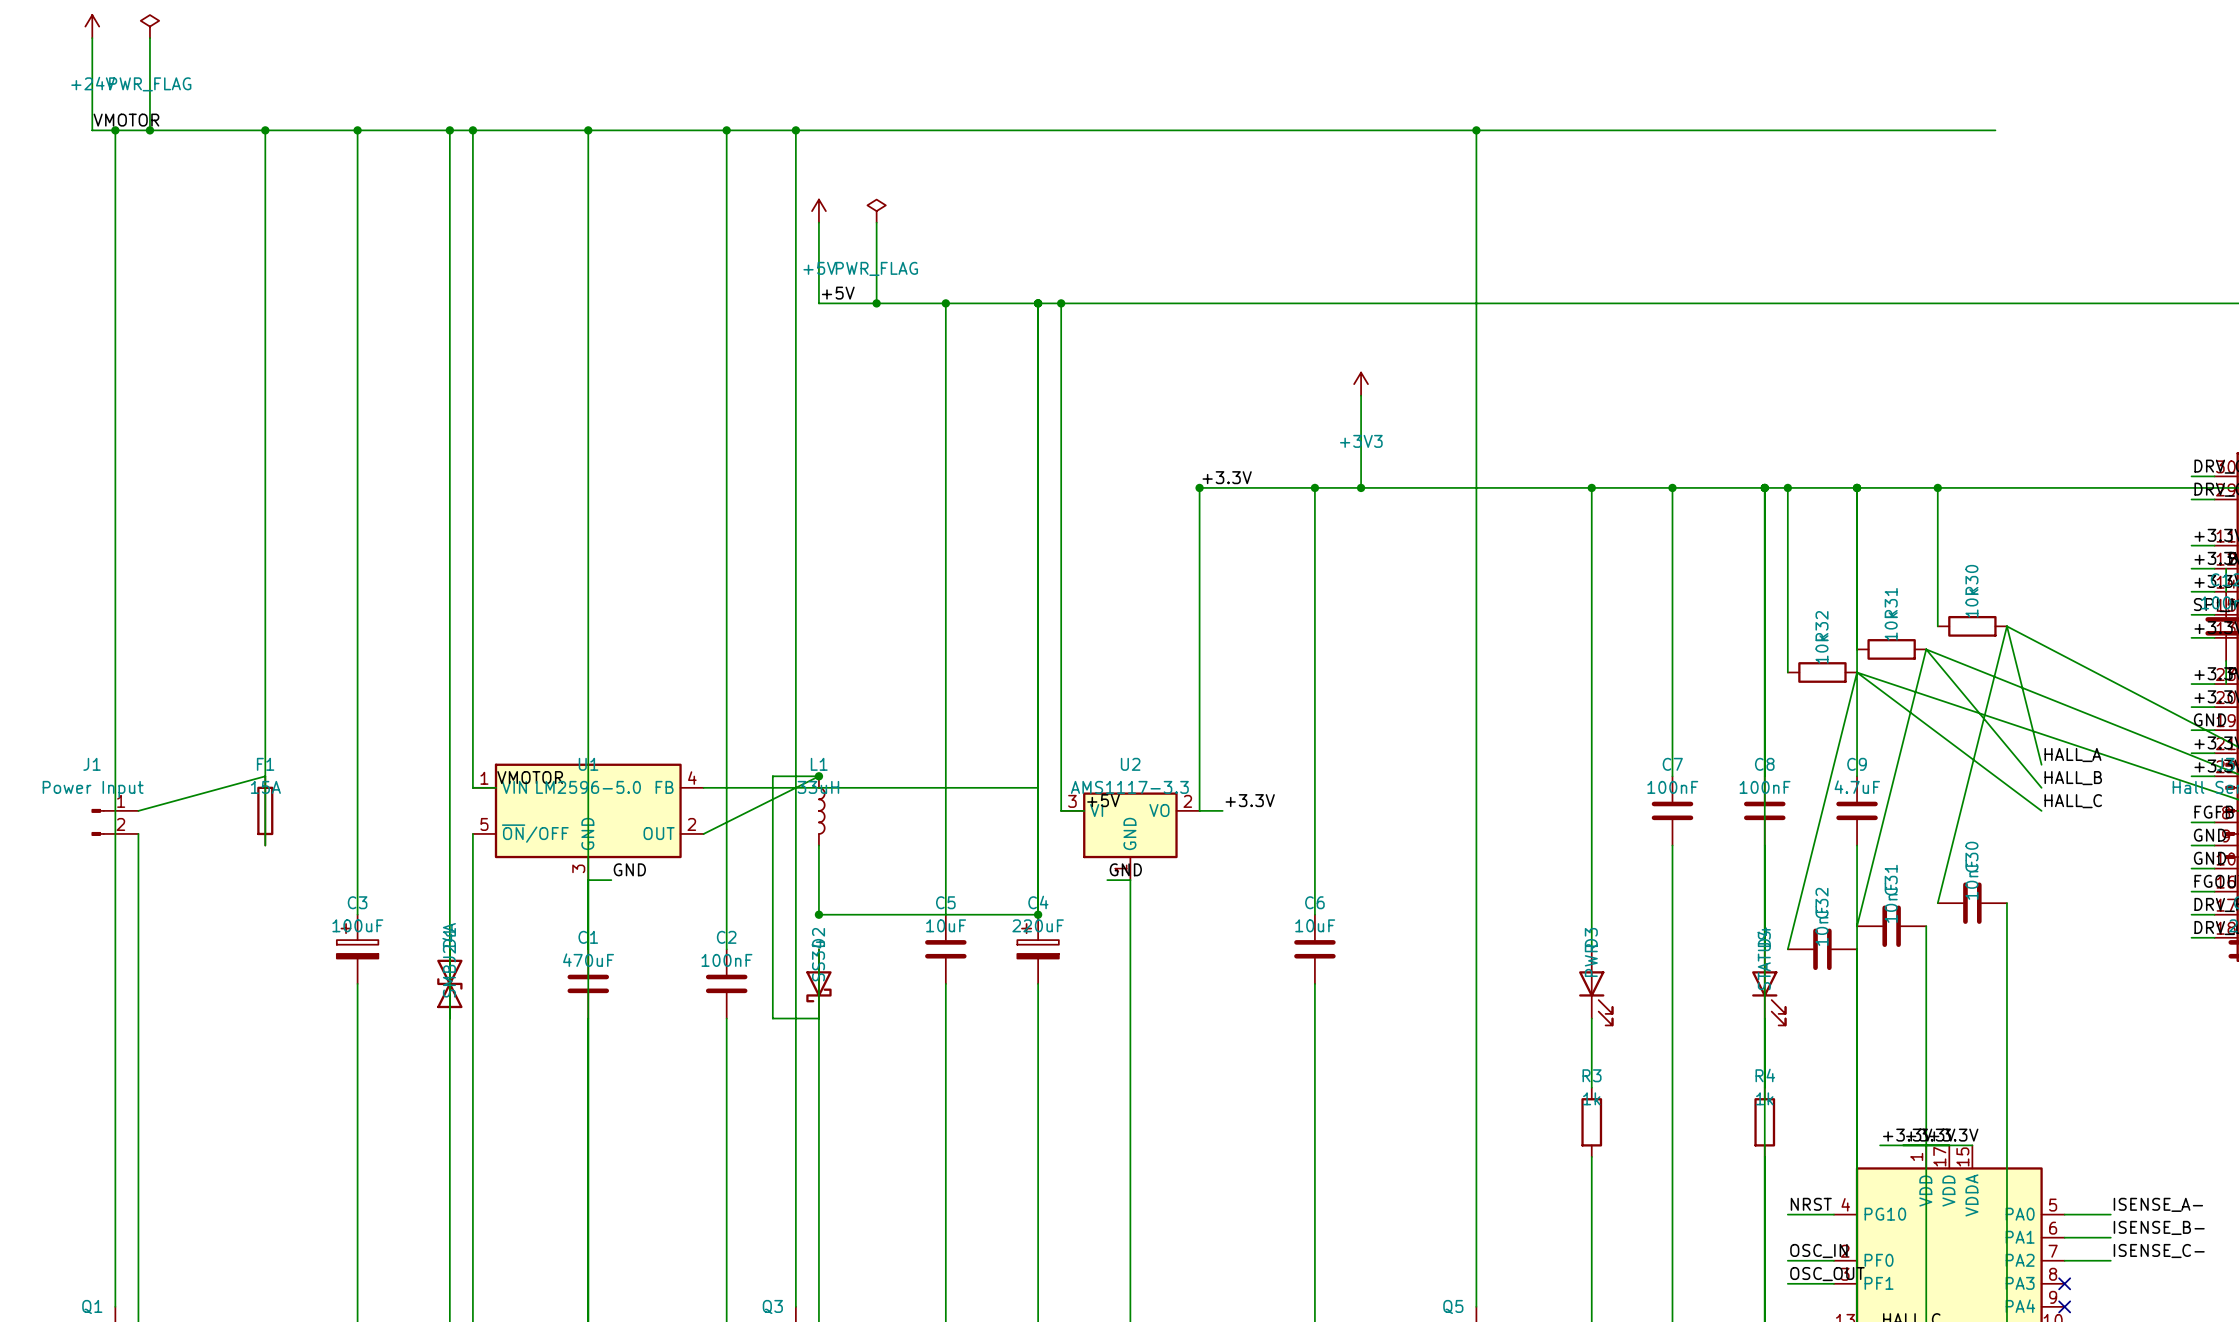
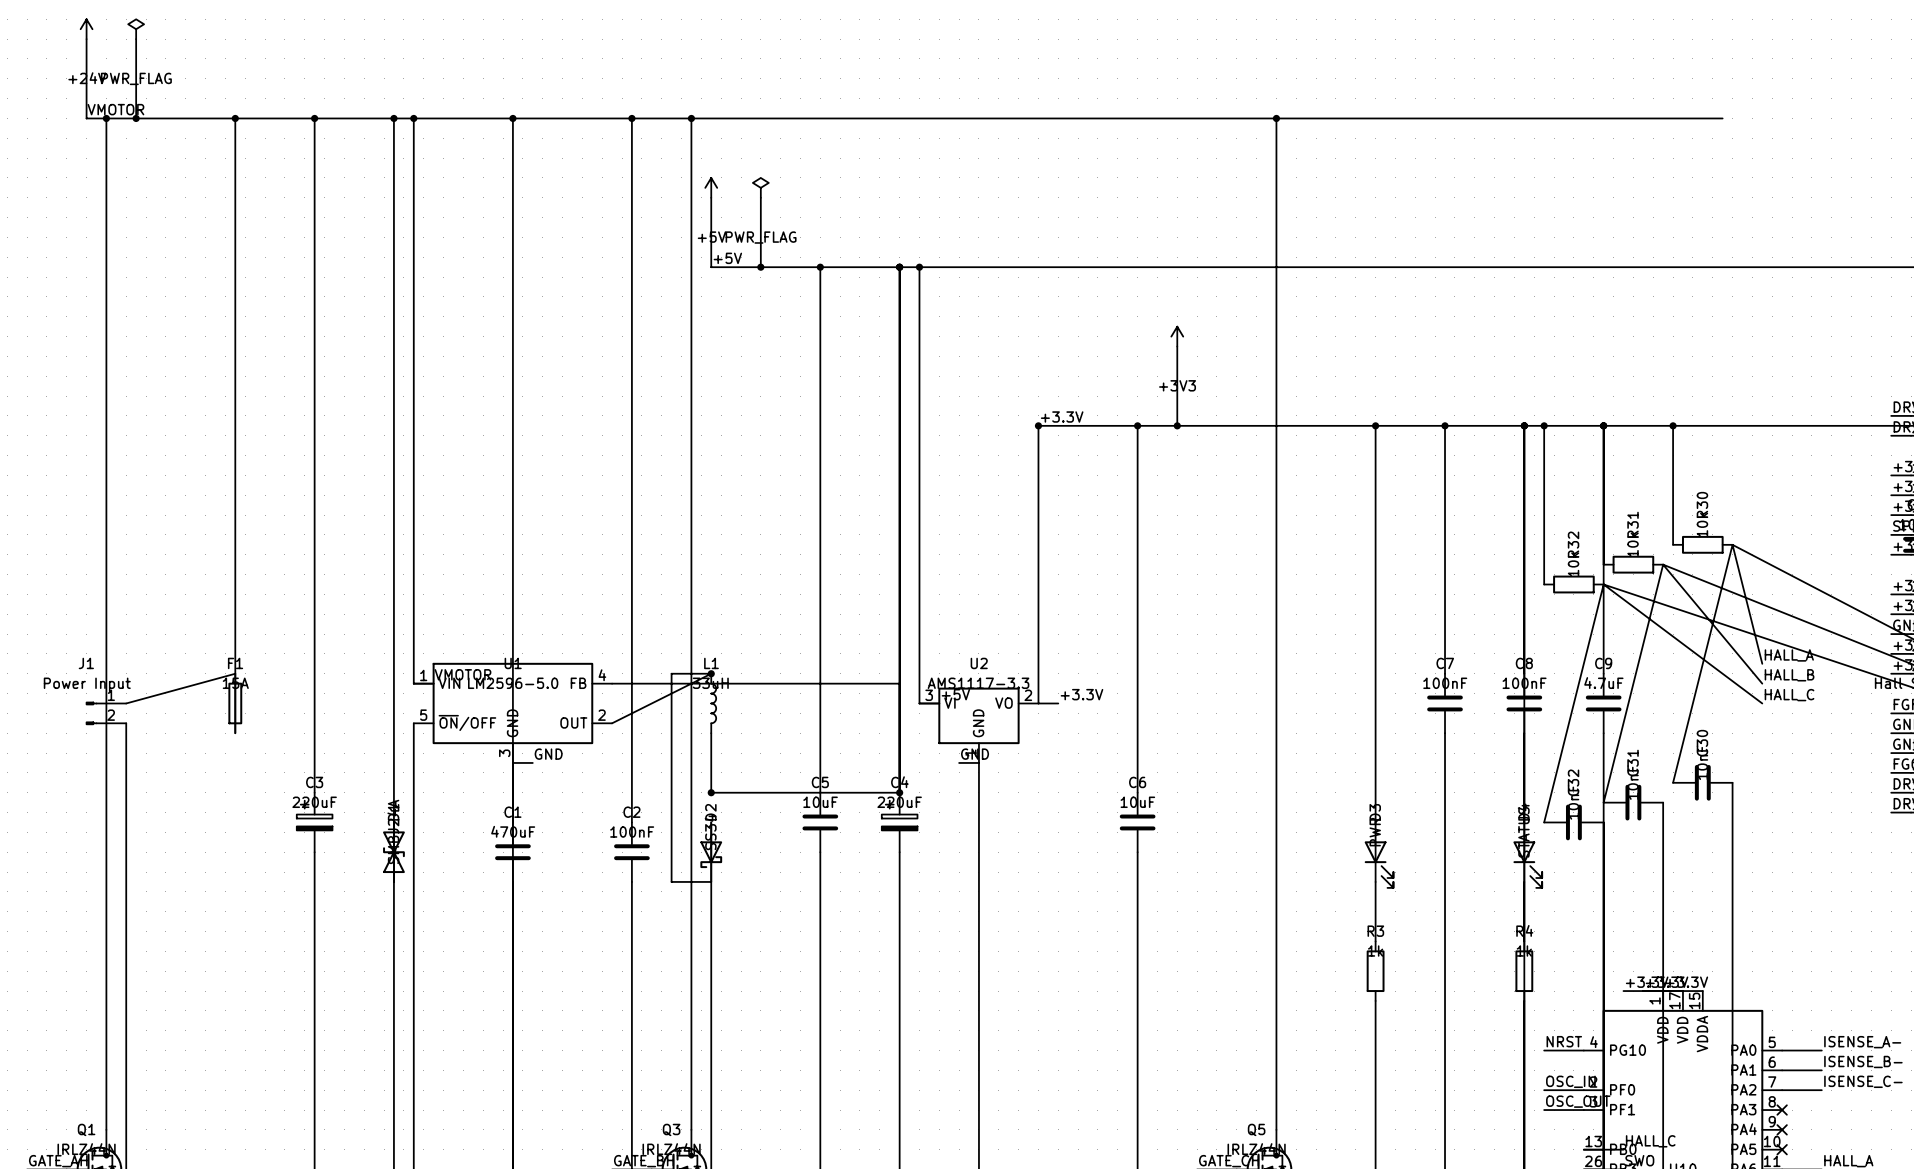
C3 value: 100uF (357, 925) -> 220uF (314, 802)

